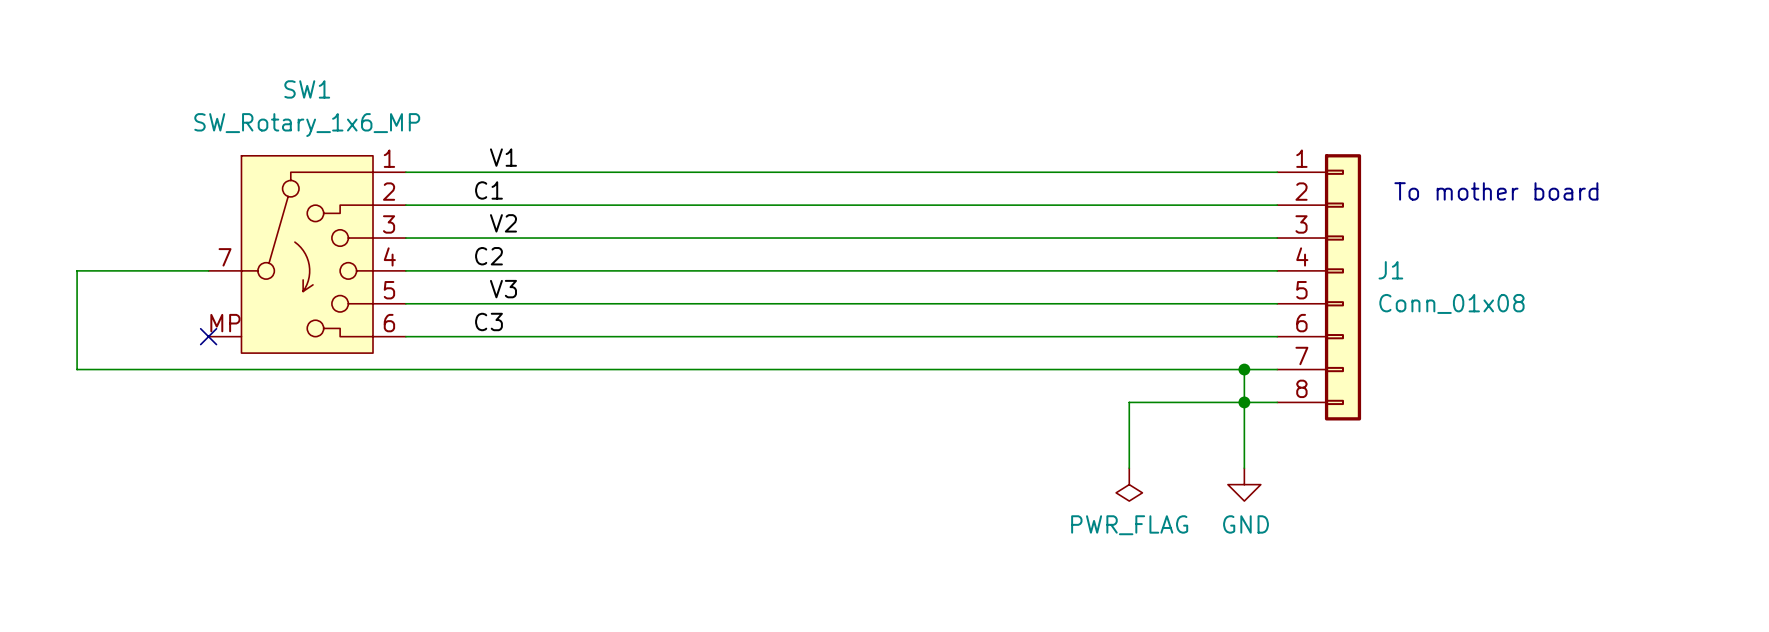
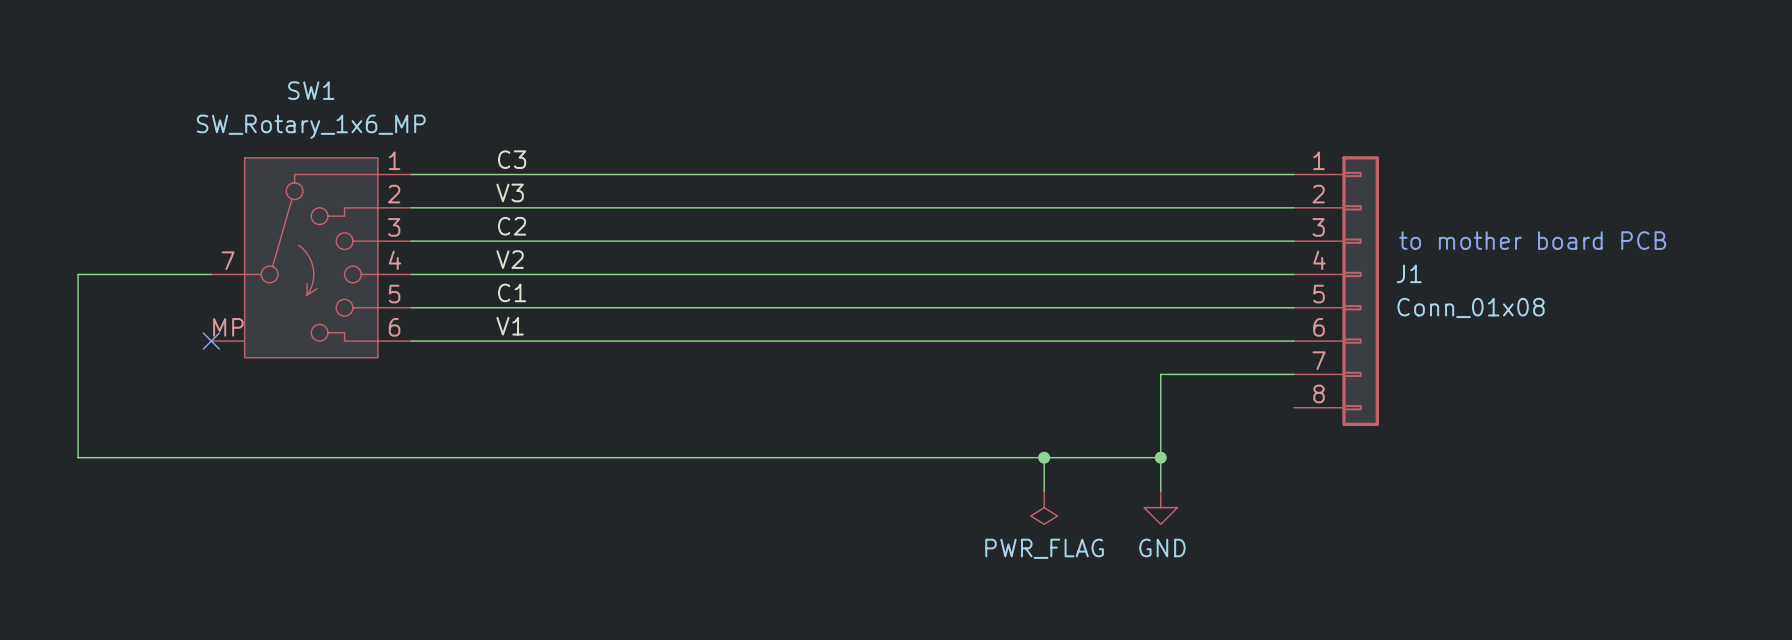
label: V1 (503, 157) -> C3 (512, 159)
label: C1 (488, 190) -> none
label: none -> V3 (510, 192)
text: To mother board (1496, 191) -> none
label: V2 (503, 223) -> C2 (512, 226)
text: none -> to mother board PCB (1532, 240)
label: C2 (488, 256) -> none
label: none -> V2 (510, 259)
label: V3 (503, 289) -> C1 (512, 292)
label: C3 (488, 321) -> none
label: none -> V1 (510, 326)
wire: (77, 369) (1145, 369) -> (78, 374) (78, 457) (1160, 457)
wire: none -> (1160, 374) (1160, 490)
wire: (1244, 369) (1244, 468) -> none
junction: (1244, 369) -> none
junction: (1244, 402) -> none
wire: (1277, 402) (1129, 402) (1129, 468) -> none
wire: none -> (1044, 457) (1044, 490)
junction: none -> (1044, 457)
junction: none -> (1160, 457)
power symbol position: PWR_FLAG (1129, 484) -> PWR_FLAG (1044, 507)
power symbol position: GND (1244, 484) -> GND (1160, 507)

